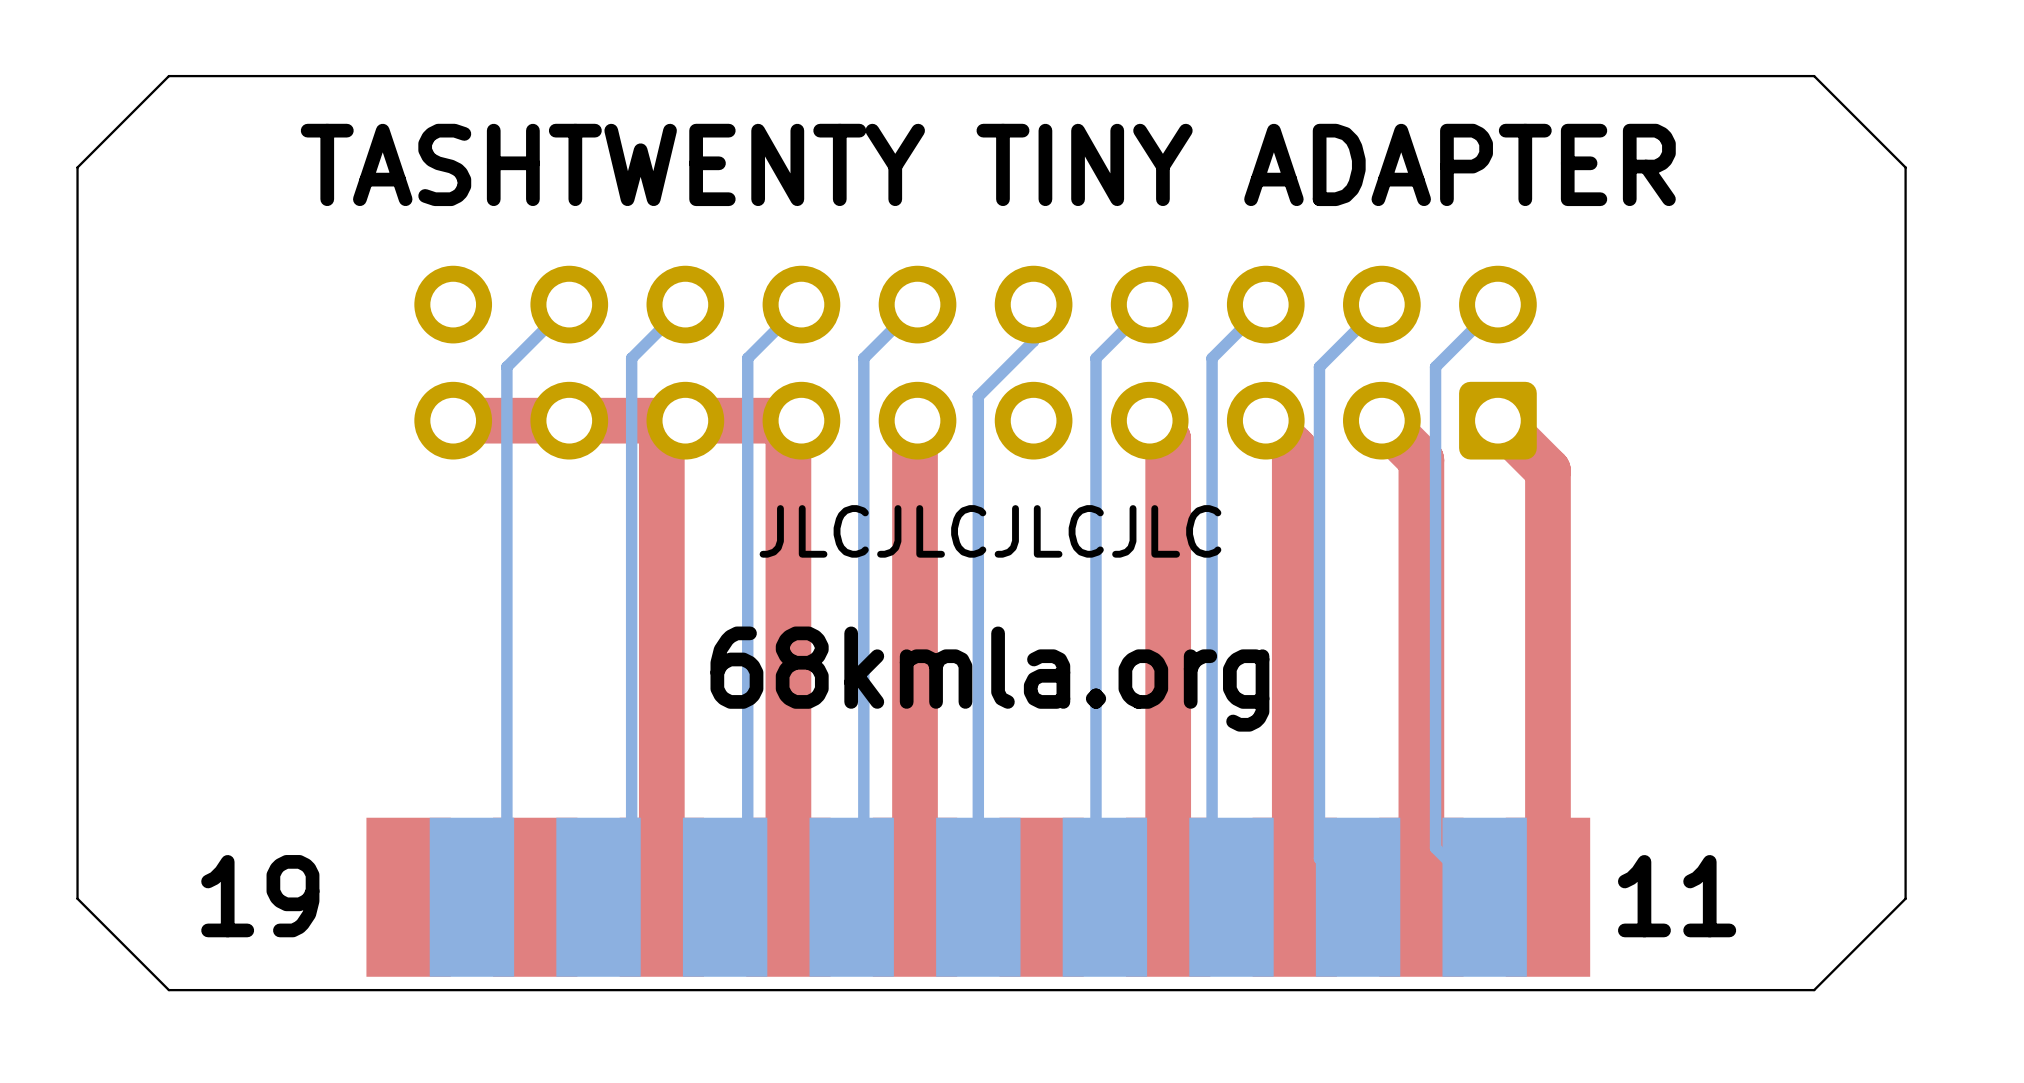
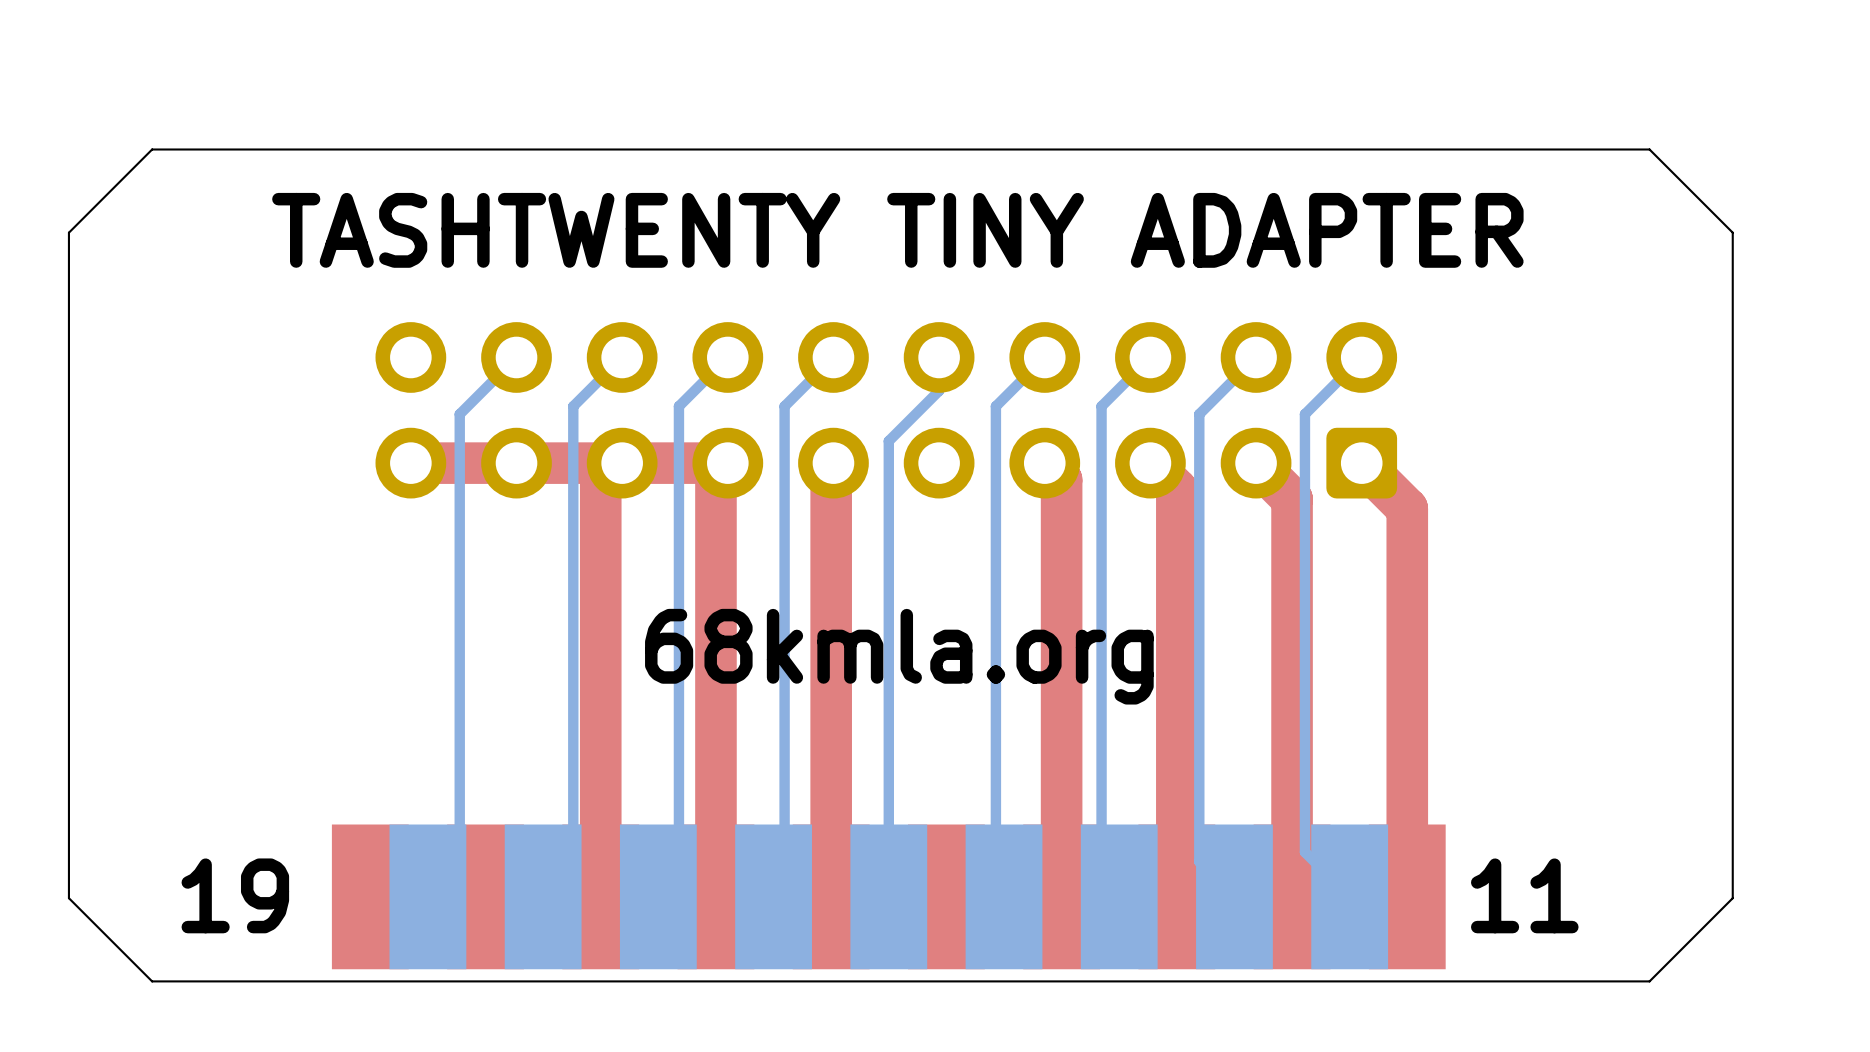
text: JLCJLCJLCJLC (990, 531) -> none
text position: 68kmla.org (989, 679) -> 68kmla.org (899, 656)

